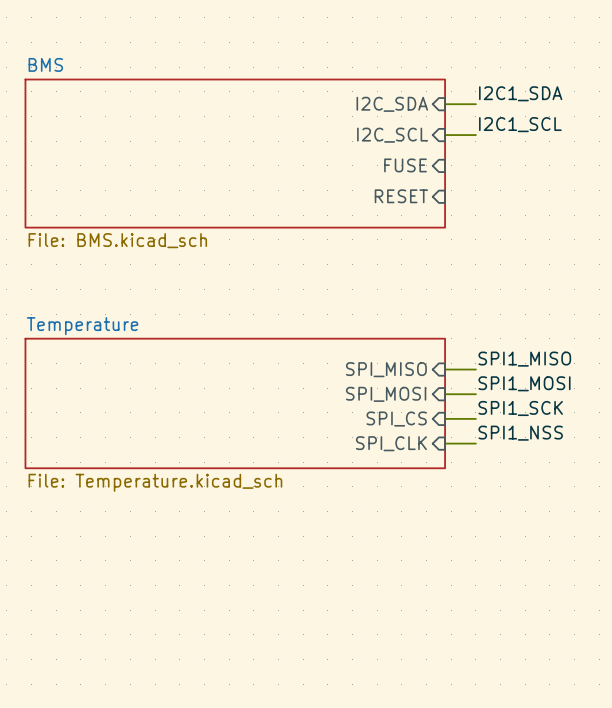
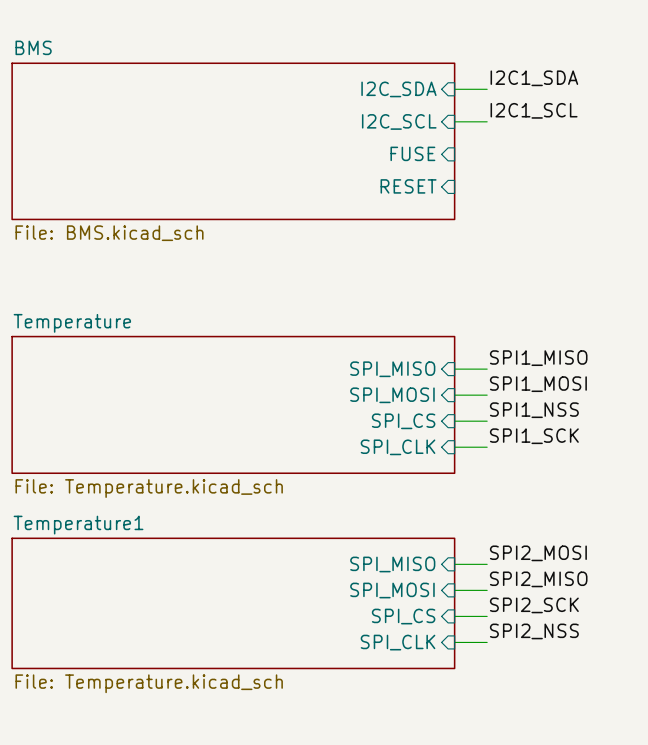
label: SPI1_SCK (520, 408) -> SPI1_NSS (534, 410)
label: SPI1_NSS (520, 433) -> SPI1_SCK (534, 436)
label: none -> SPI2_MOSI (538, 553)
sheet pin: none -> SPI_MISO (392, 564)
wire: none -> (454, 564) (487, 564)
label: none -> SPI2_MISO (538, 579)
sheet pin: none -> SPI_MOSI (392, 590)
wire: none -> (454, 590) (487, 590)
sheet Temperature1: none -> File: Temperature.kicad_sch (233, 603)
label: none -> SPI2_SCK (534, 605)
sheet pin: none -> SPI_CS (403, 616)
wire: none -> (454, 616) (487, 616)
label: none -> SPI2_NSS (534, 631)
sheet pin: none -> SPI_CLK (398, 642)
wire: none -> (454, 642) (487, 642)

